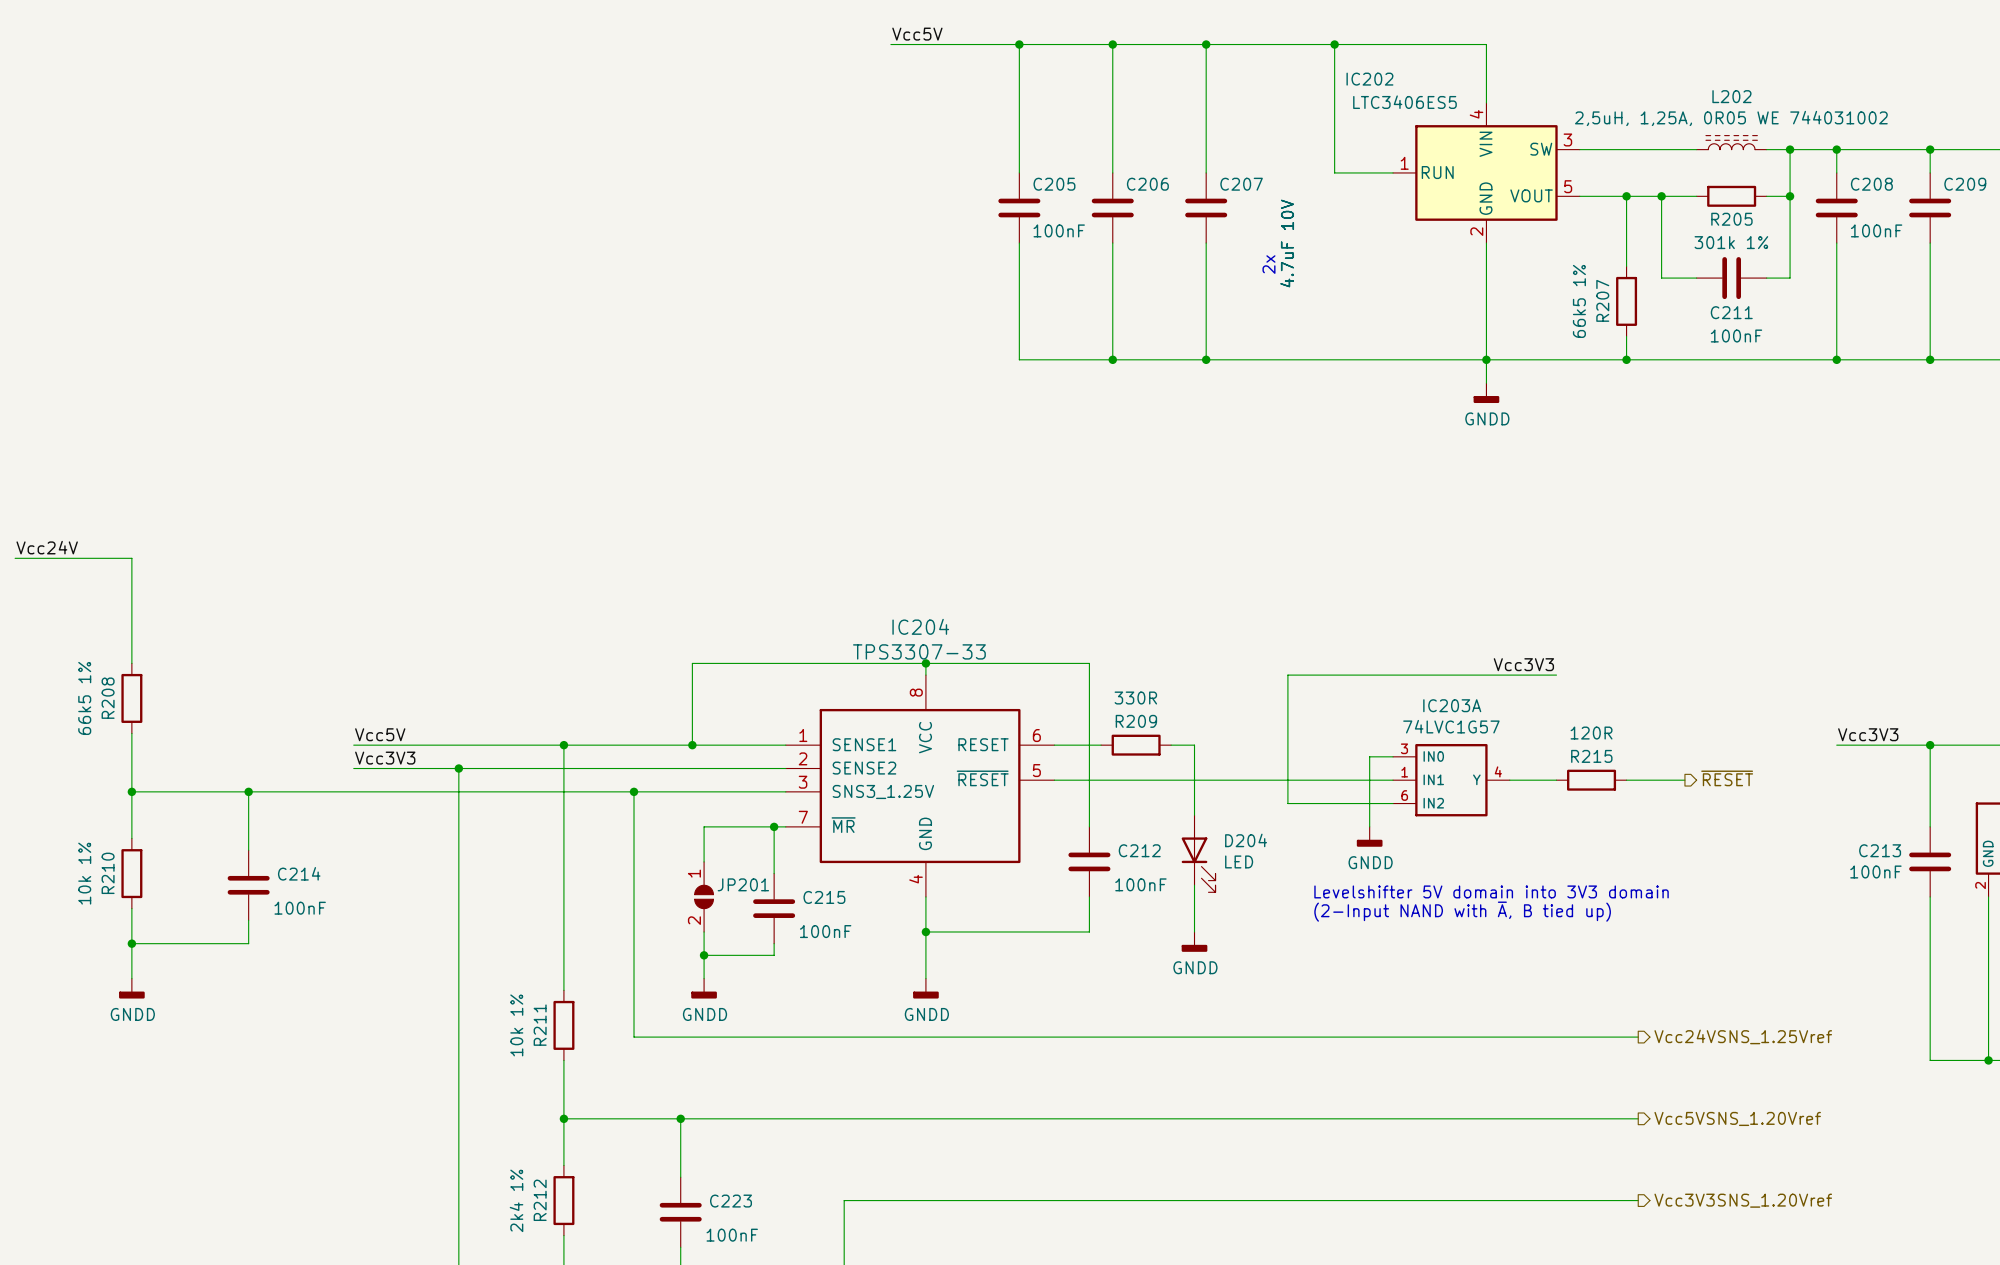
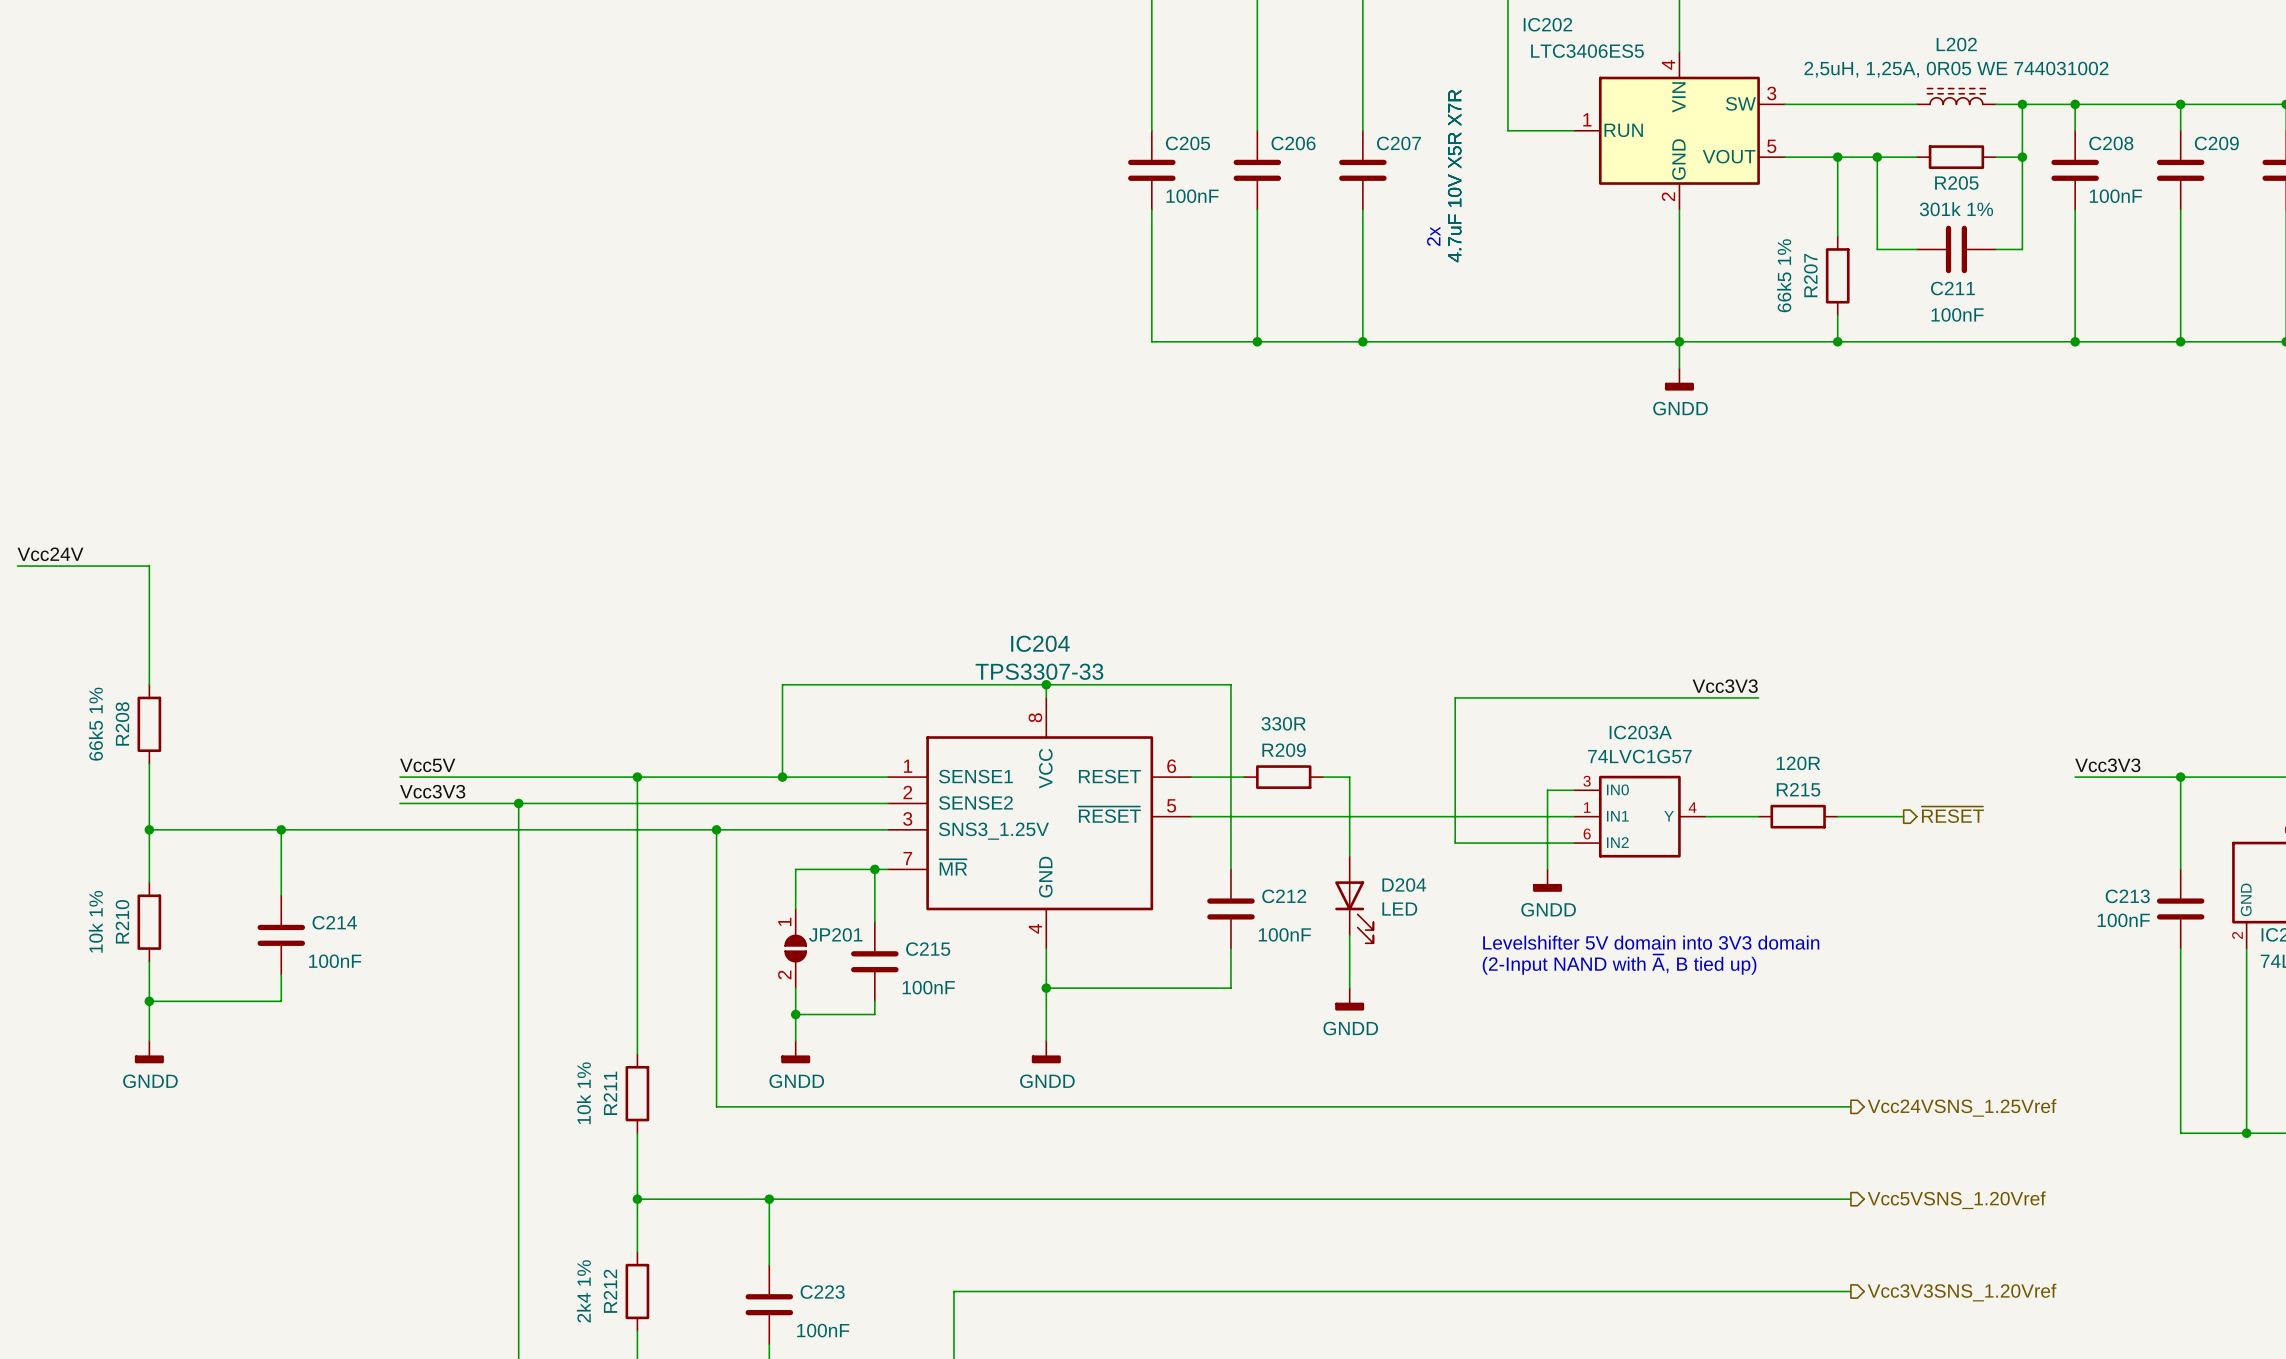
C207 value: 4.7uF 10V (1287, 243) -> 4.7uF 10V X5R X7R (1454, 176)
C206 value: 4.7uF 10V (1287, 243) -> 4.7uF 10V X5R X7R (1454, 176)

